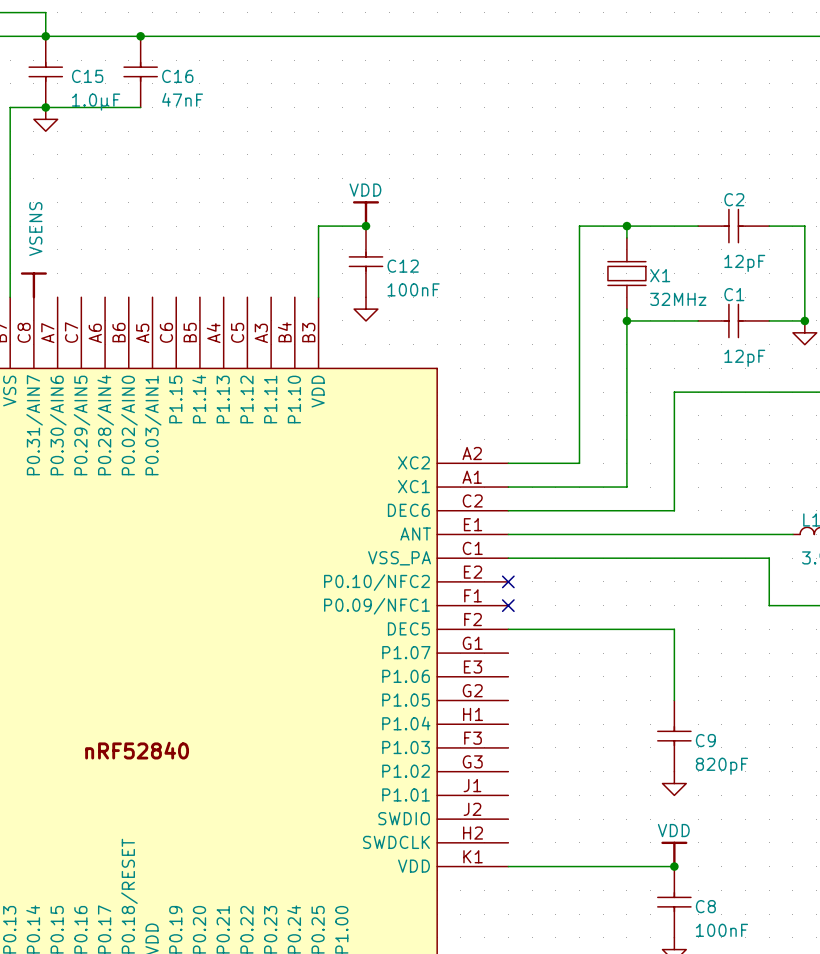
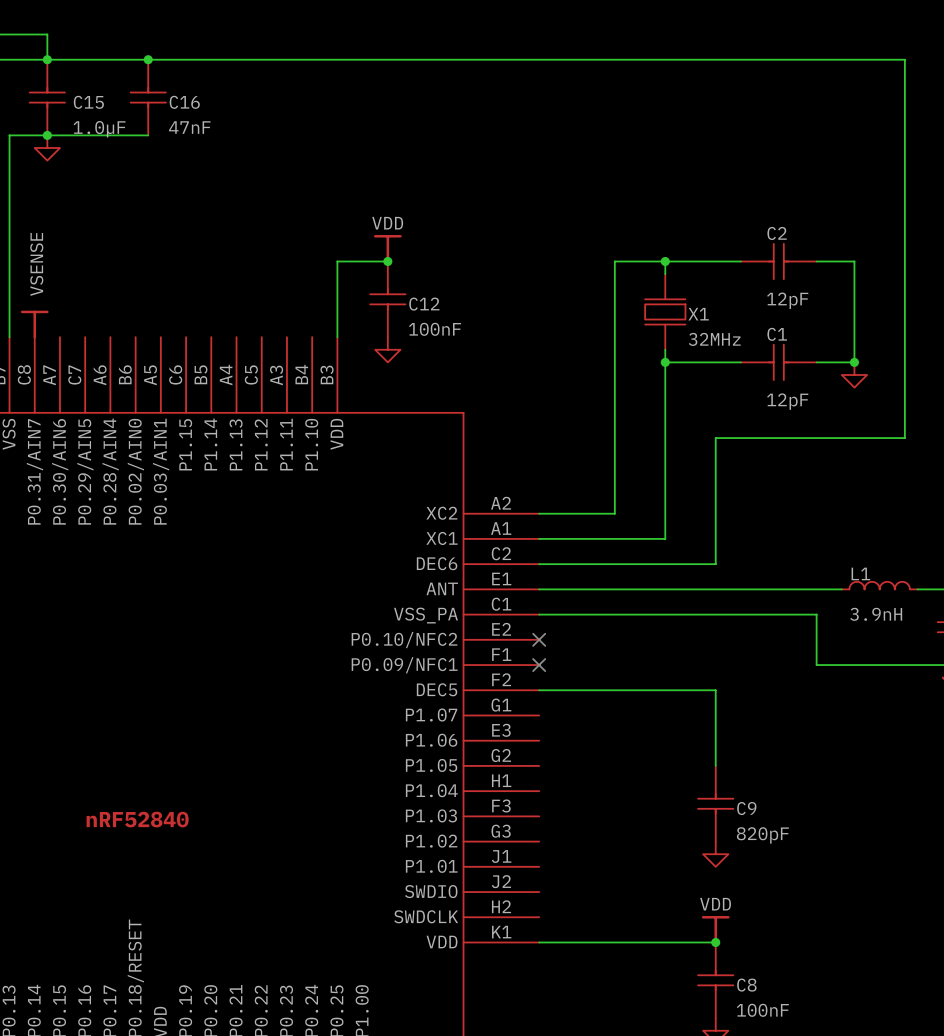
power symbol: VSENS (33, 285) -> VSENSE (34, 324)

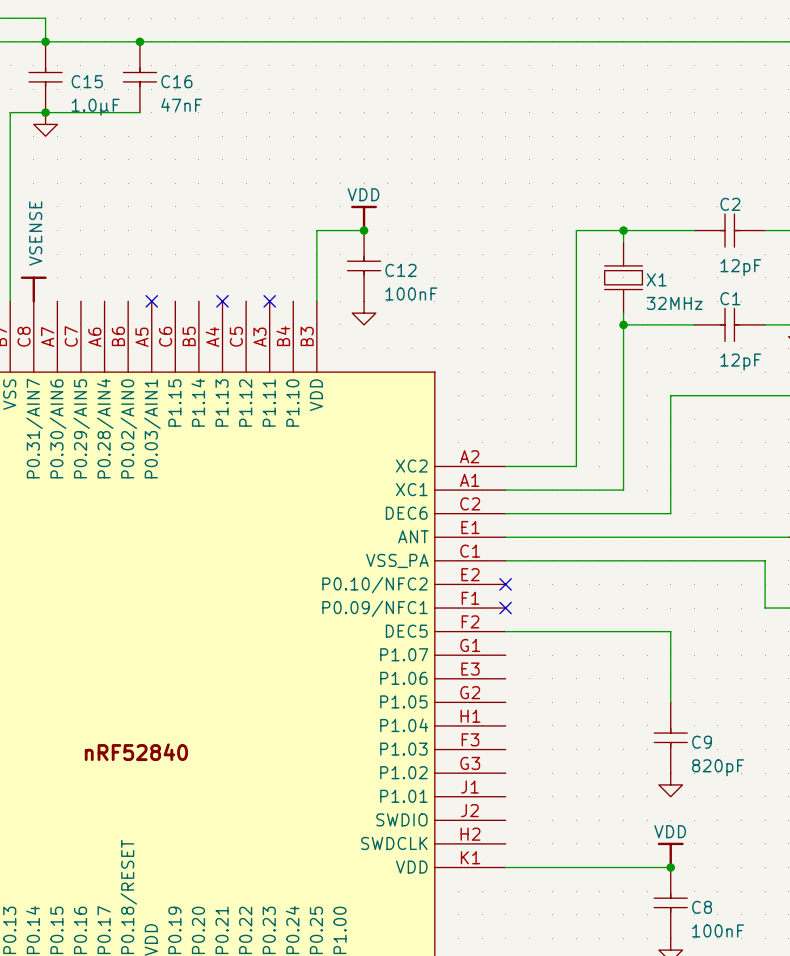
no-connect mark: none -> (151, 301)
no-connect mark: none -> (222, 301)
no-connect mark: none -> (269, 301)

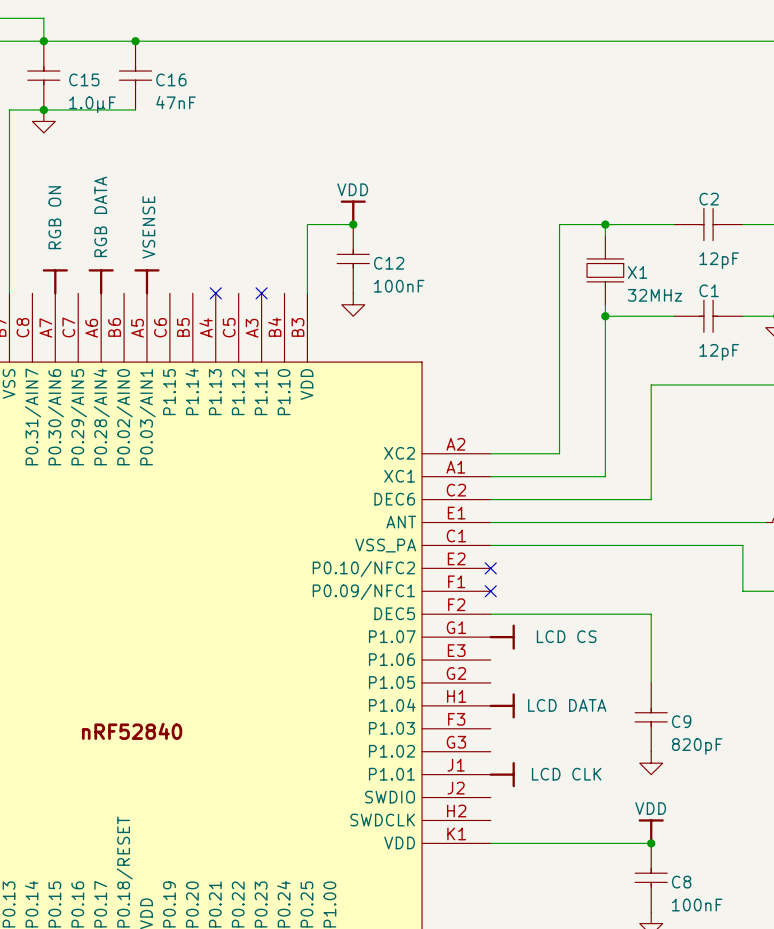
power symbol position: VSENSE (33, 289) -> VSENSE (146, 281)
power symbol: none -> RGB ON (55, 281)
power symbol: none -> RGB DATA (101, 281)
no-connect mark: (151, 301) -> none
power symbol: none -> LCD CS (502, 637)
power symbol: none -> LCD DATA (502, 705)
power symbol: none -> LCD CLK (502, 774)

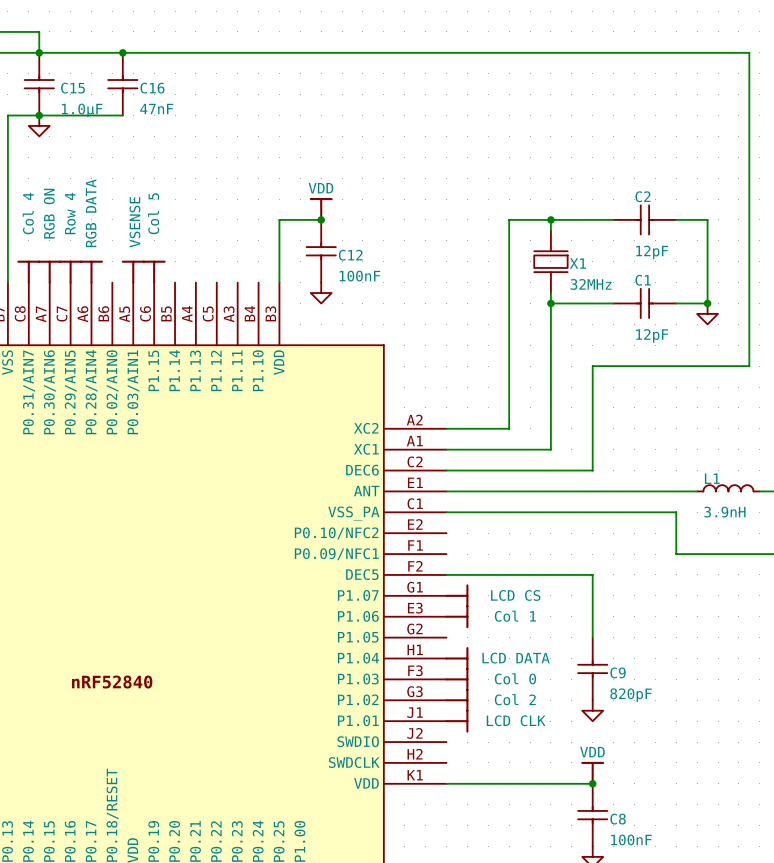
power symbol: none -> Col 4 (28, 272)
power symbol: none -> Row 4 (70, 272)
power symbol: none -> Col 5 (154, 272)
no-connect mark: (215, 293) -> none
no-connect mark: (261, 293) -> none
no-connect mark: (490, 568) -> none
no-connect mark: (490, 591) -> none
power symbol: none -> Col 1 (456, 616)
power symbol: none -> Col 0 (456, 679)
power symbol: none -> Col 2 (456, 700)

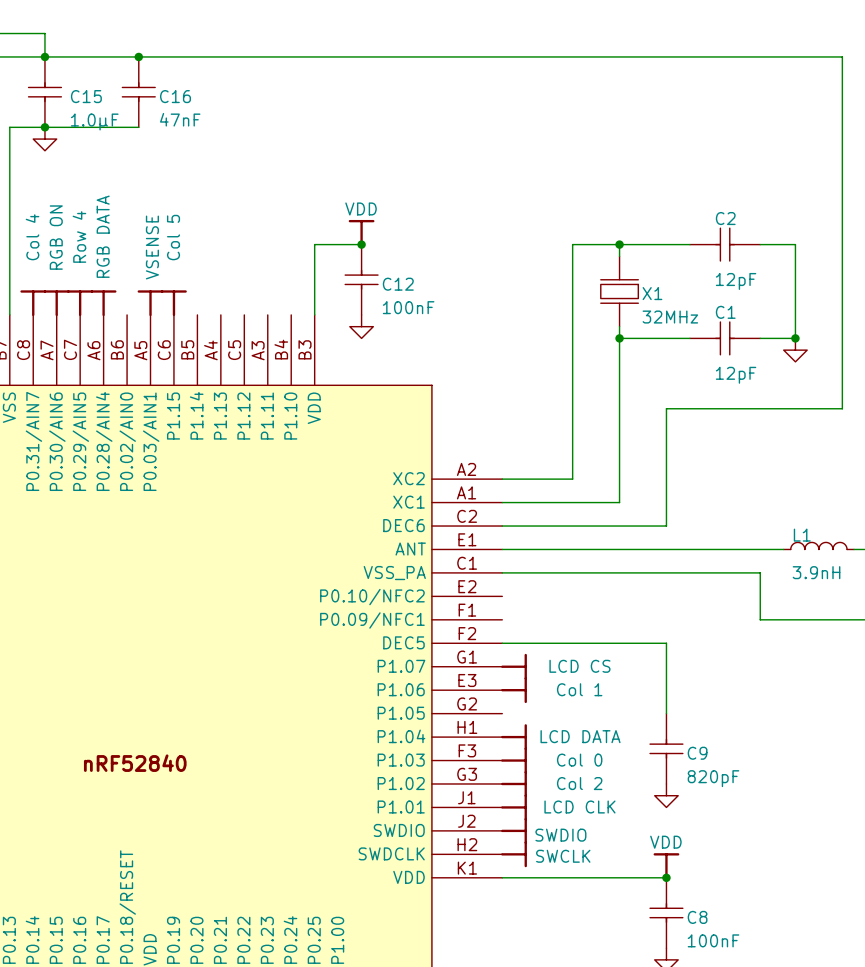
power symbol: none -> SWDIO (514, 830)
power symbol: none -> SWCLK (514, 854)

